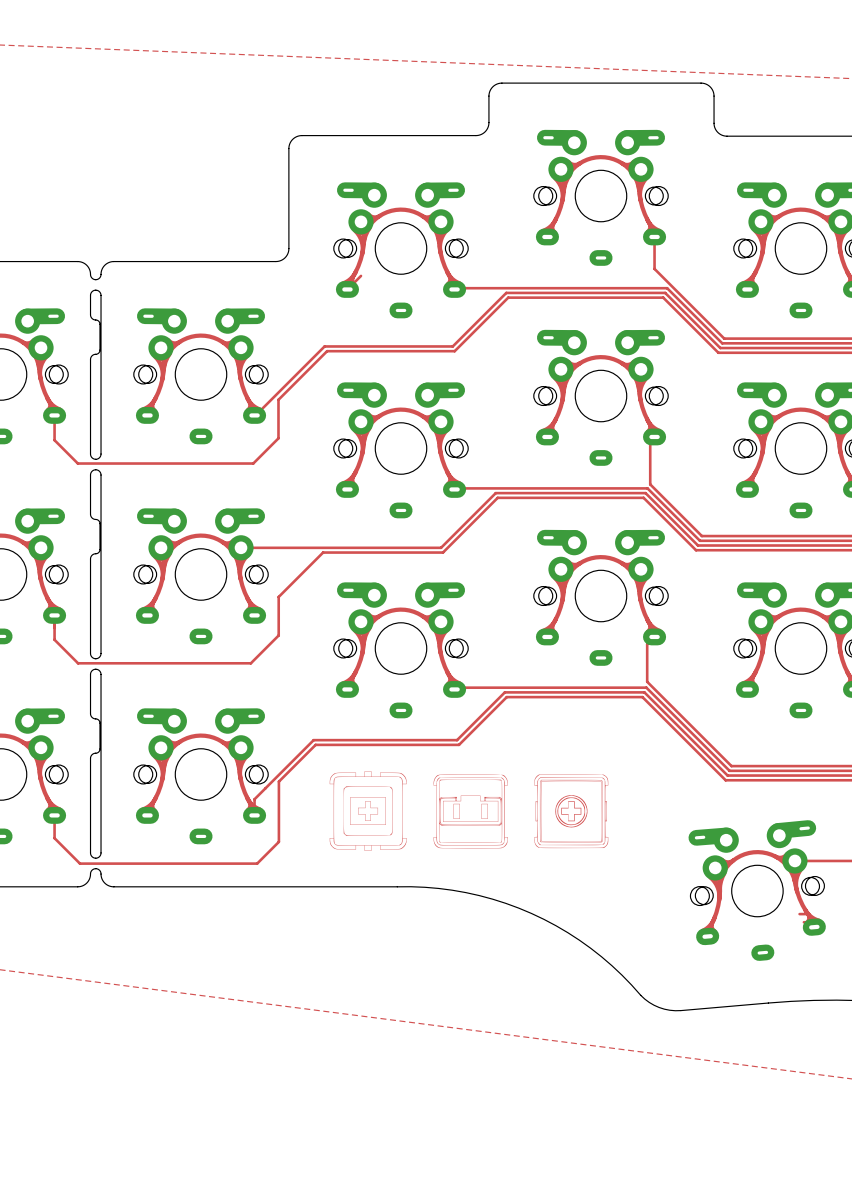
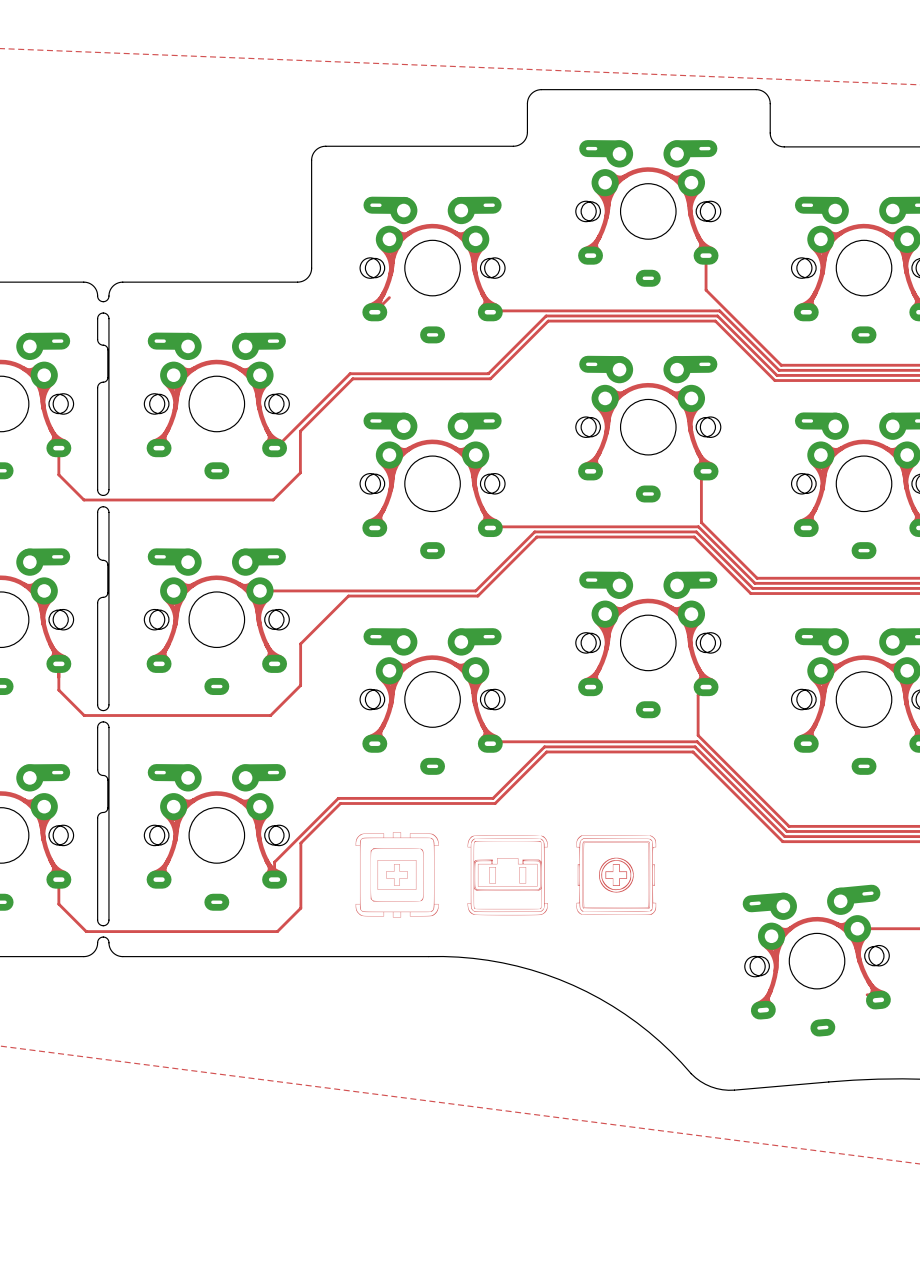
track: (799, 914) (805, 914) -> none

